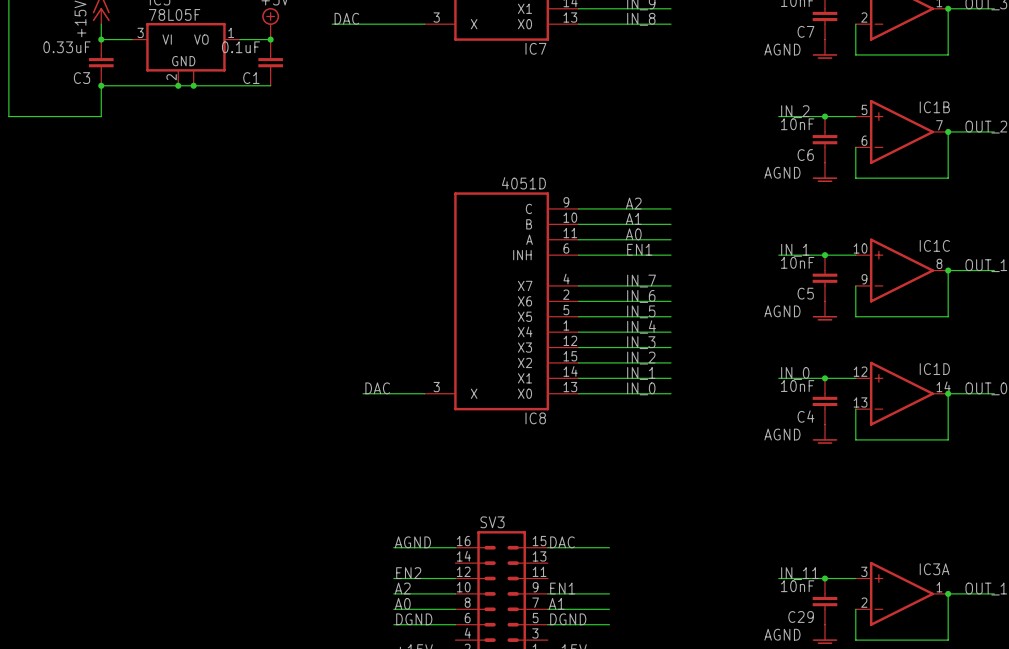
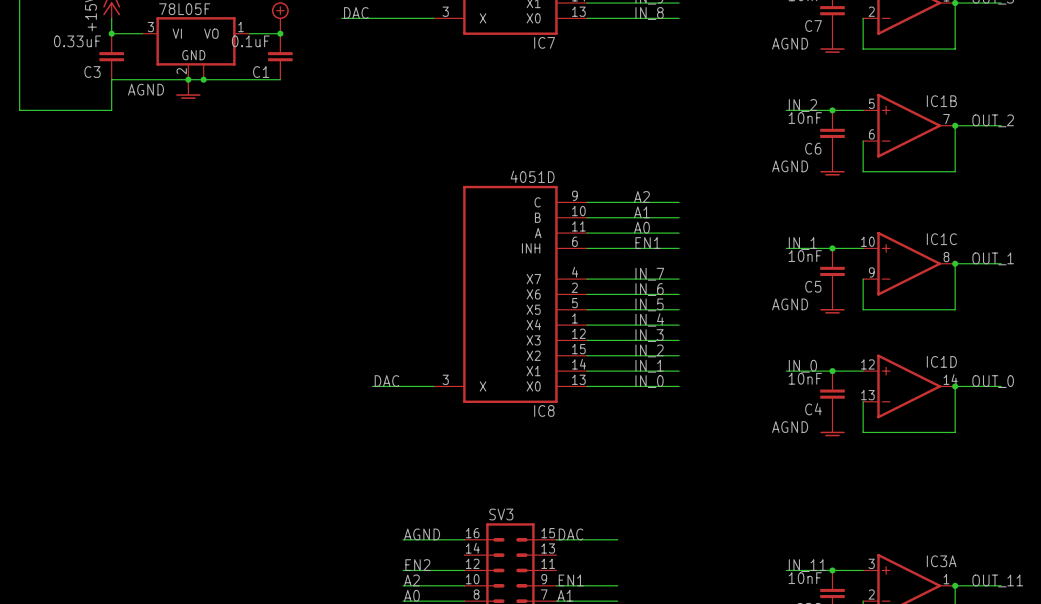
junction: (101, 85) -> none
power symbol: none -> AGND (188, 89)

